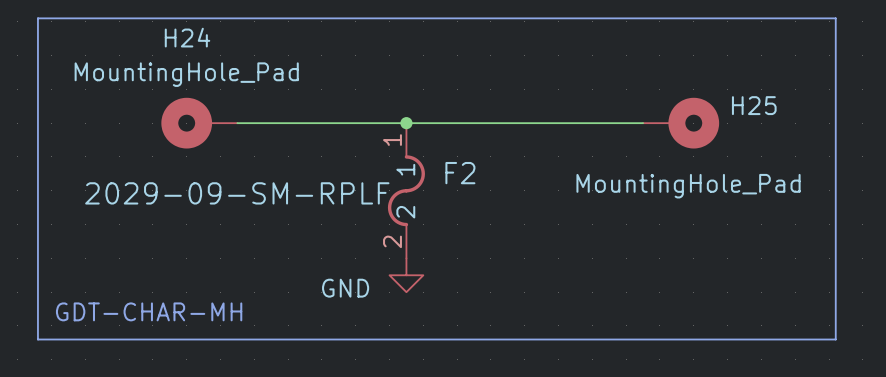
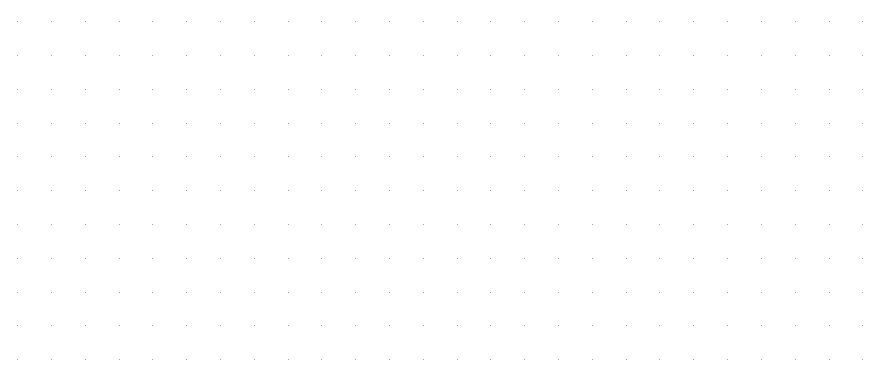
line: (37, 18) (835, 18) (835, 339) (37, 339) (37, 18) -> none
H24: MountingHole_Pad (199, 123) -> none
wire: (237, 123) (643, 123) -> none
junction: (406, 123) -> none
H25: MountingHole_Pad (681, 123) -> none
F2: 2029-09-SM-RPLF (406, 190) -> none
power symbol: GND (406, 275) -> none
text: GDT-CHAR-MH (149, 311) -> none

